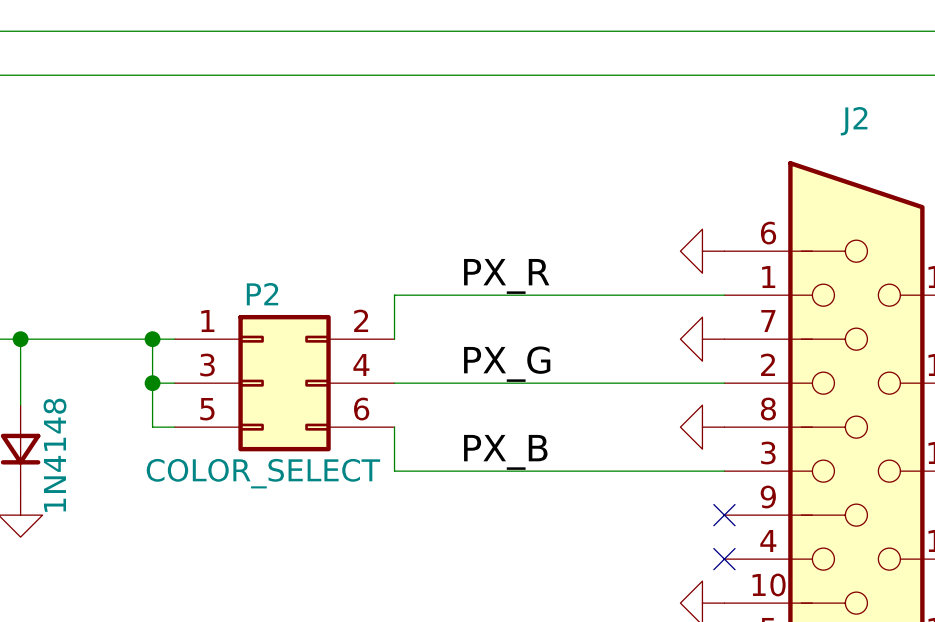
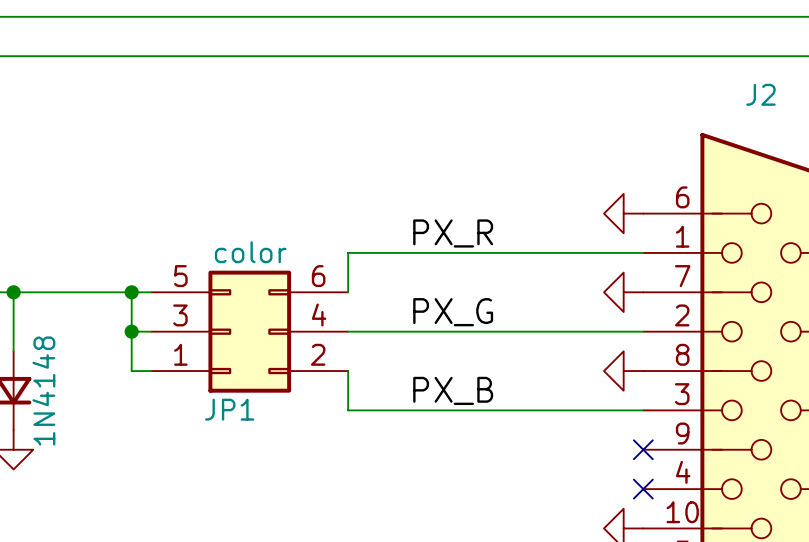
P2 name: P2 (262, 294) -> JP1 (229, 409)
P2 flip: as is (284, 383) -> up-down (249, 331)
P2 value: COLOR_SELECT (263, 473) -> color (250, 252)

